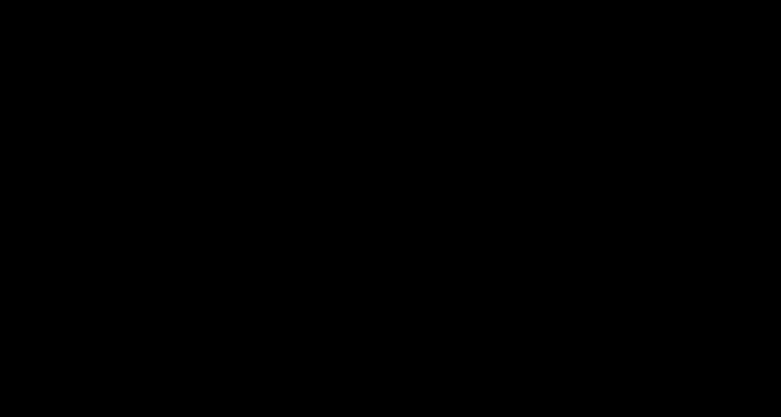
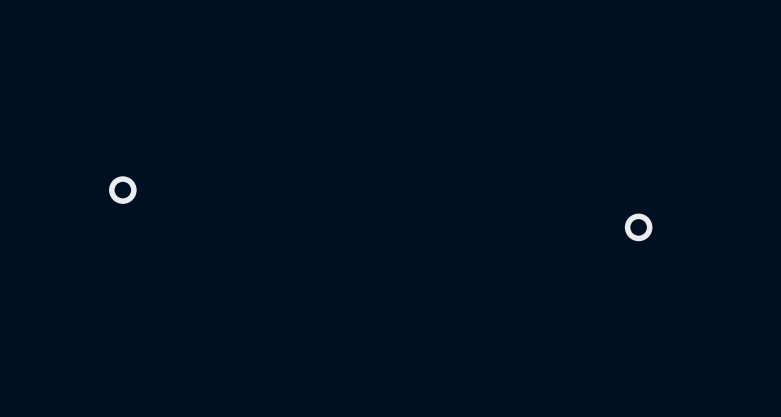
via: none -> (122, 190)
via: none -> (638, 227)

